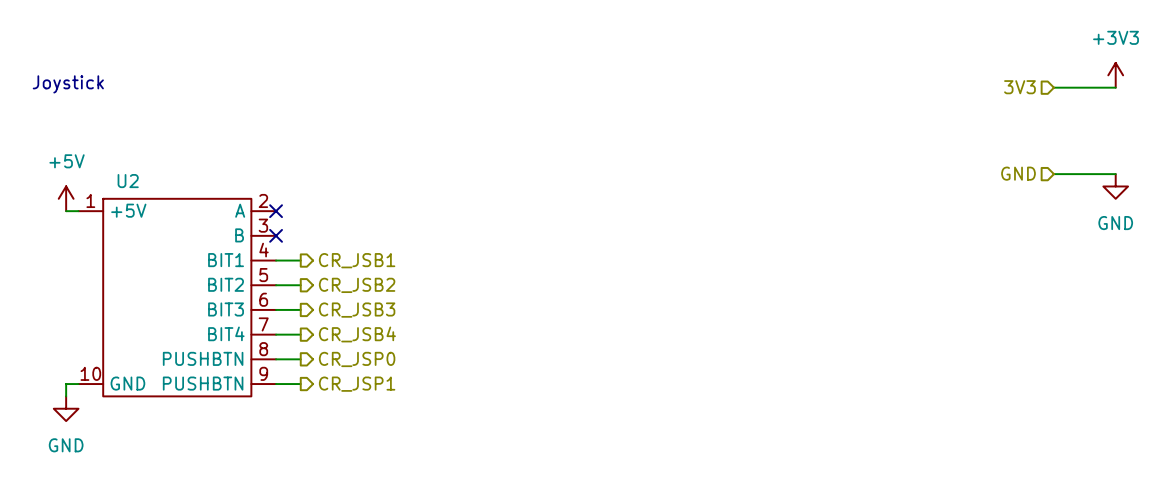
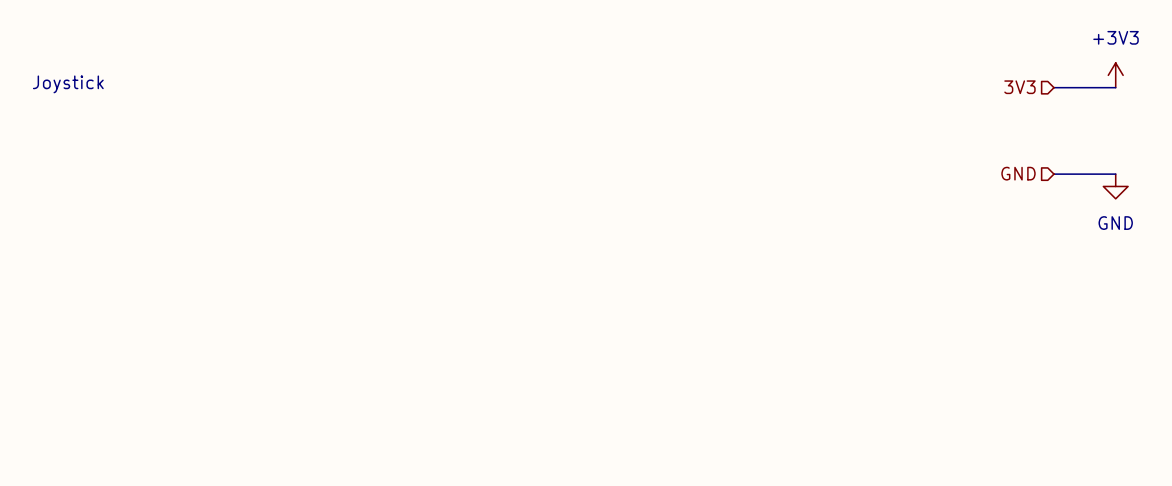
power symbol: +5V (66, 198) -> none
wire: (66, 211) (78, 211) -> none
no-connect mark: (276, 211) -> none
no-connect mark: (276, 235) -> none
wire: (276, 260) (300, 260) -> none
hierarchical label: CR_JSB1 (357, 260) -> none
wire: (276, 285) (300, 285) -> none
hierarchical label: CR_JSB2 (357, 285) -> none
U2: (177, 297) -> none
wire: (276, 309) (300, 309) -> none
hierarchical label: CR_JSB3 (357, 310) -> none
wire: (276, 334) (300, 334) -> none
hierarchical label: CR_JSB4 (357, 334) -> none
wire: (276, 359) (300, 359) -> none
hierarchical label: CR_JSP0 (357, 359) -> none
wire: (78, 384) (66, 384) (66, 396) -> none
wire: (276, 384) (300, 384) -> none
hierarchical label: CR_JSP1 (357, 384) -> none
power symbol: GND (66, 408) -> none

